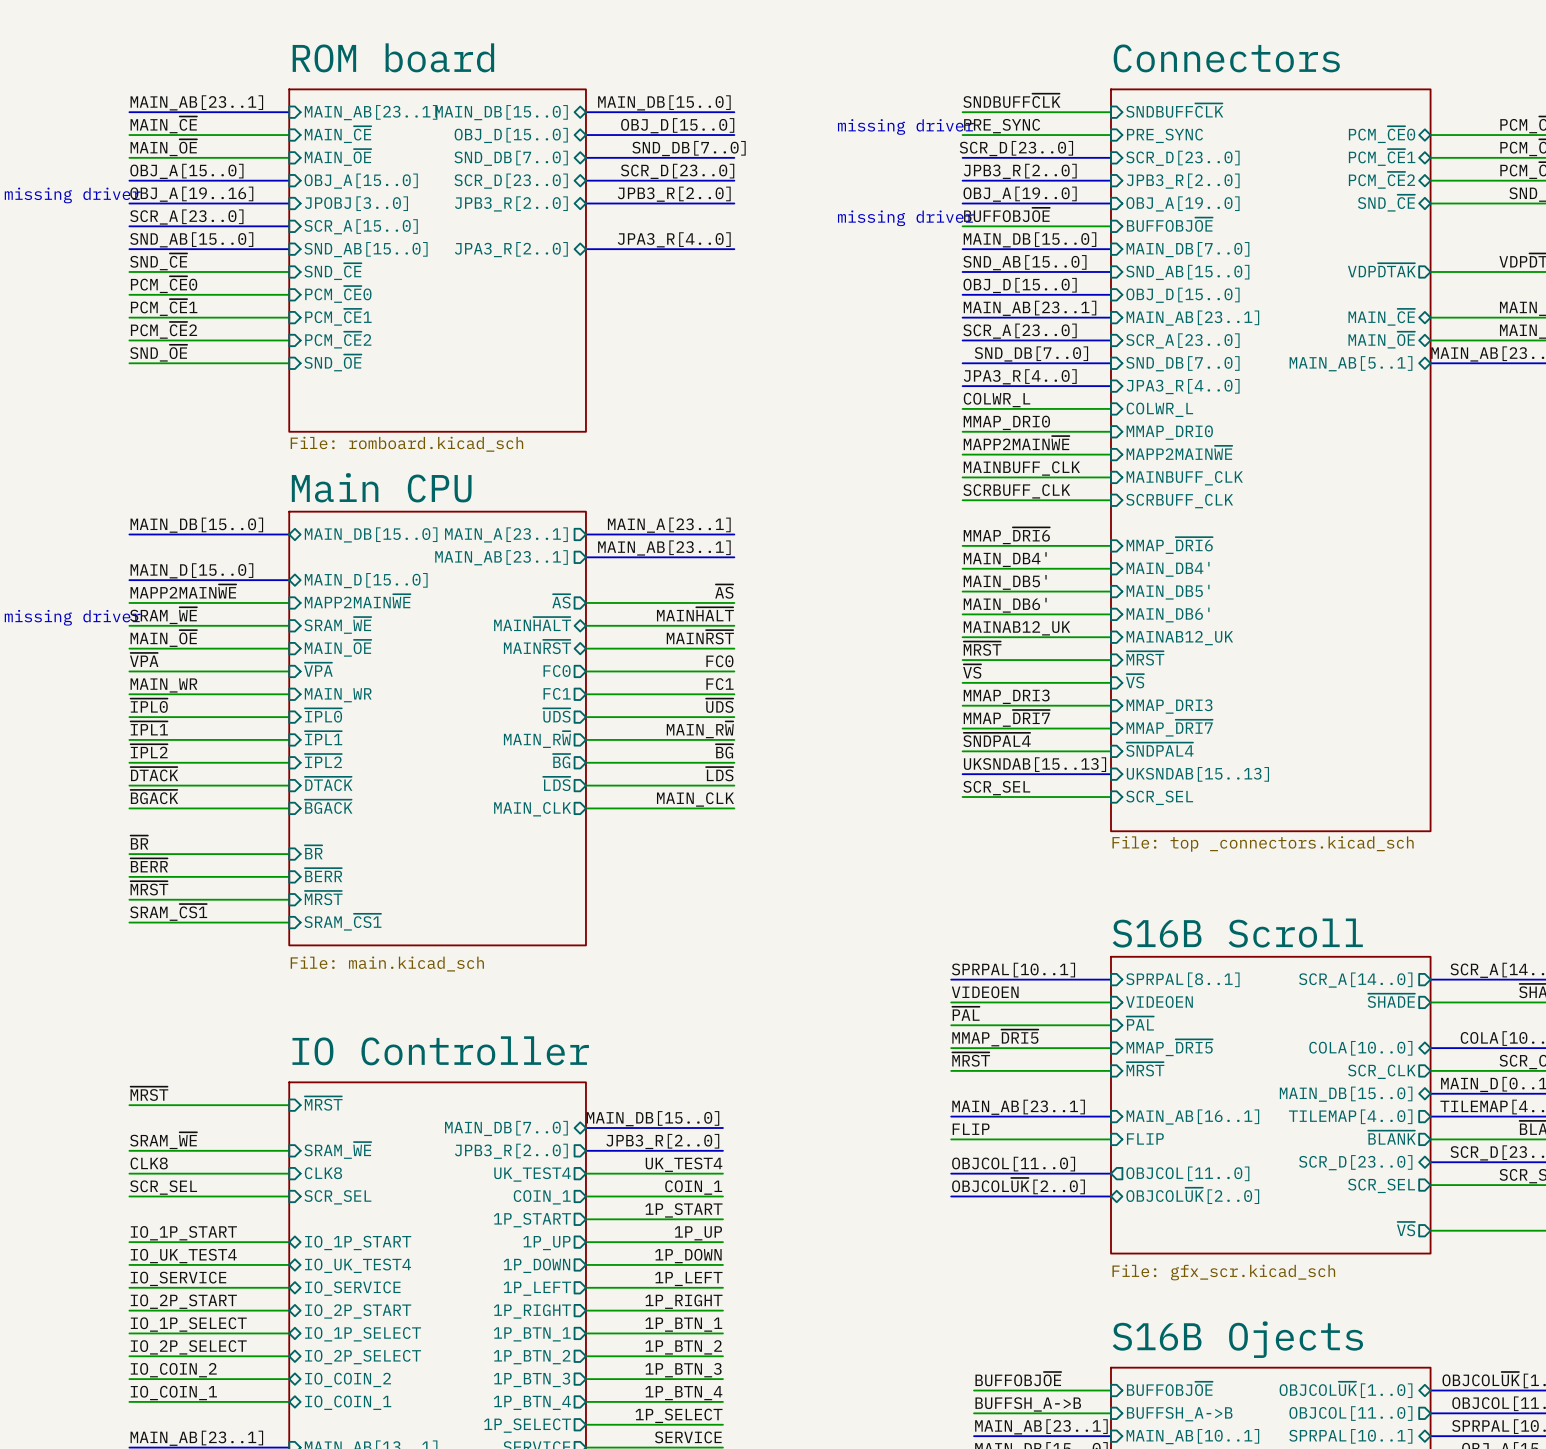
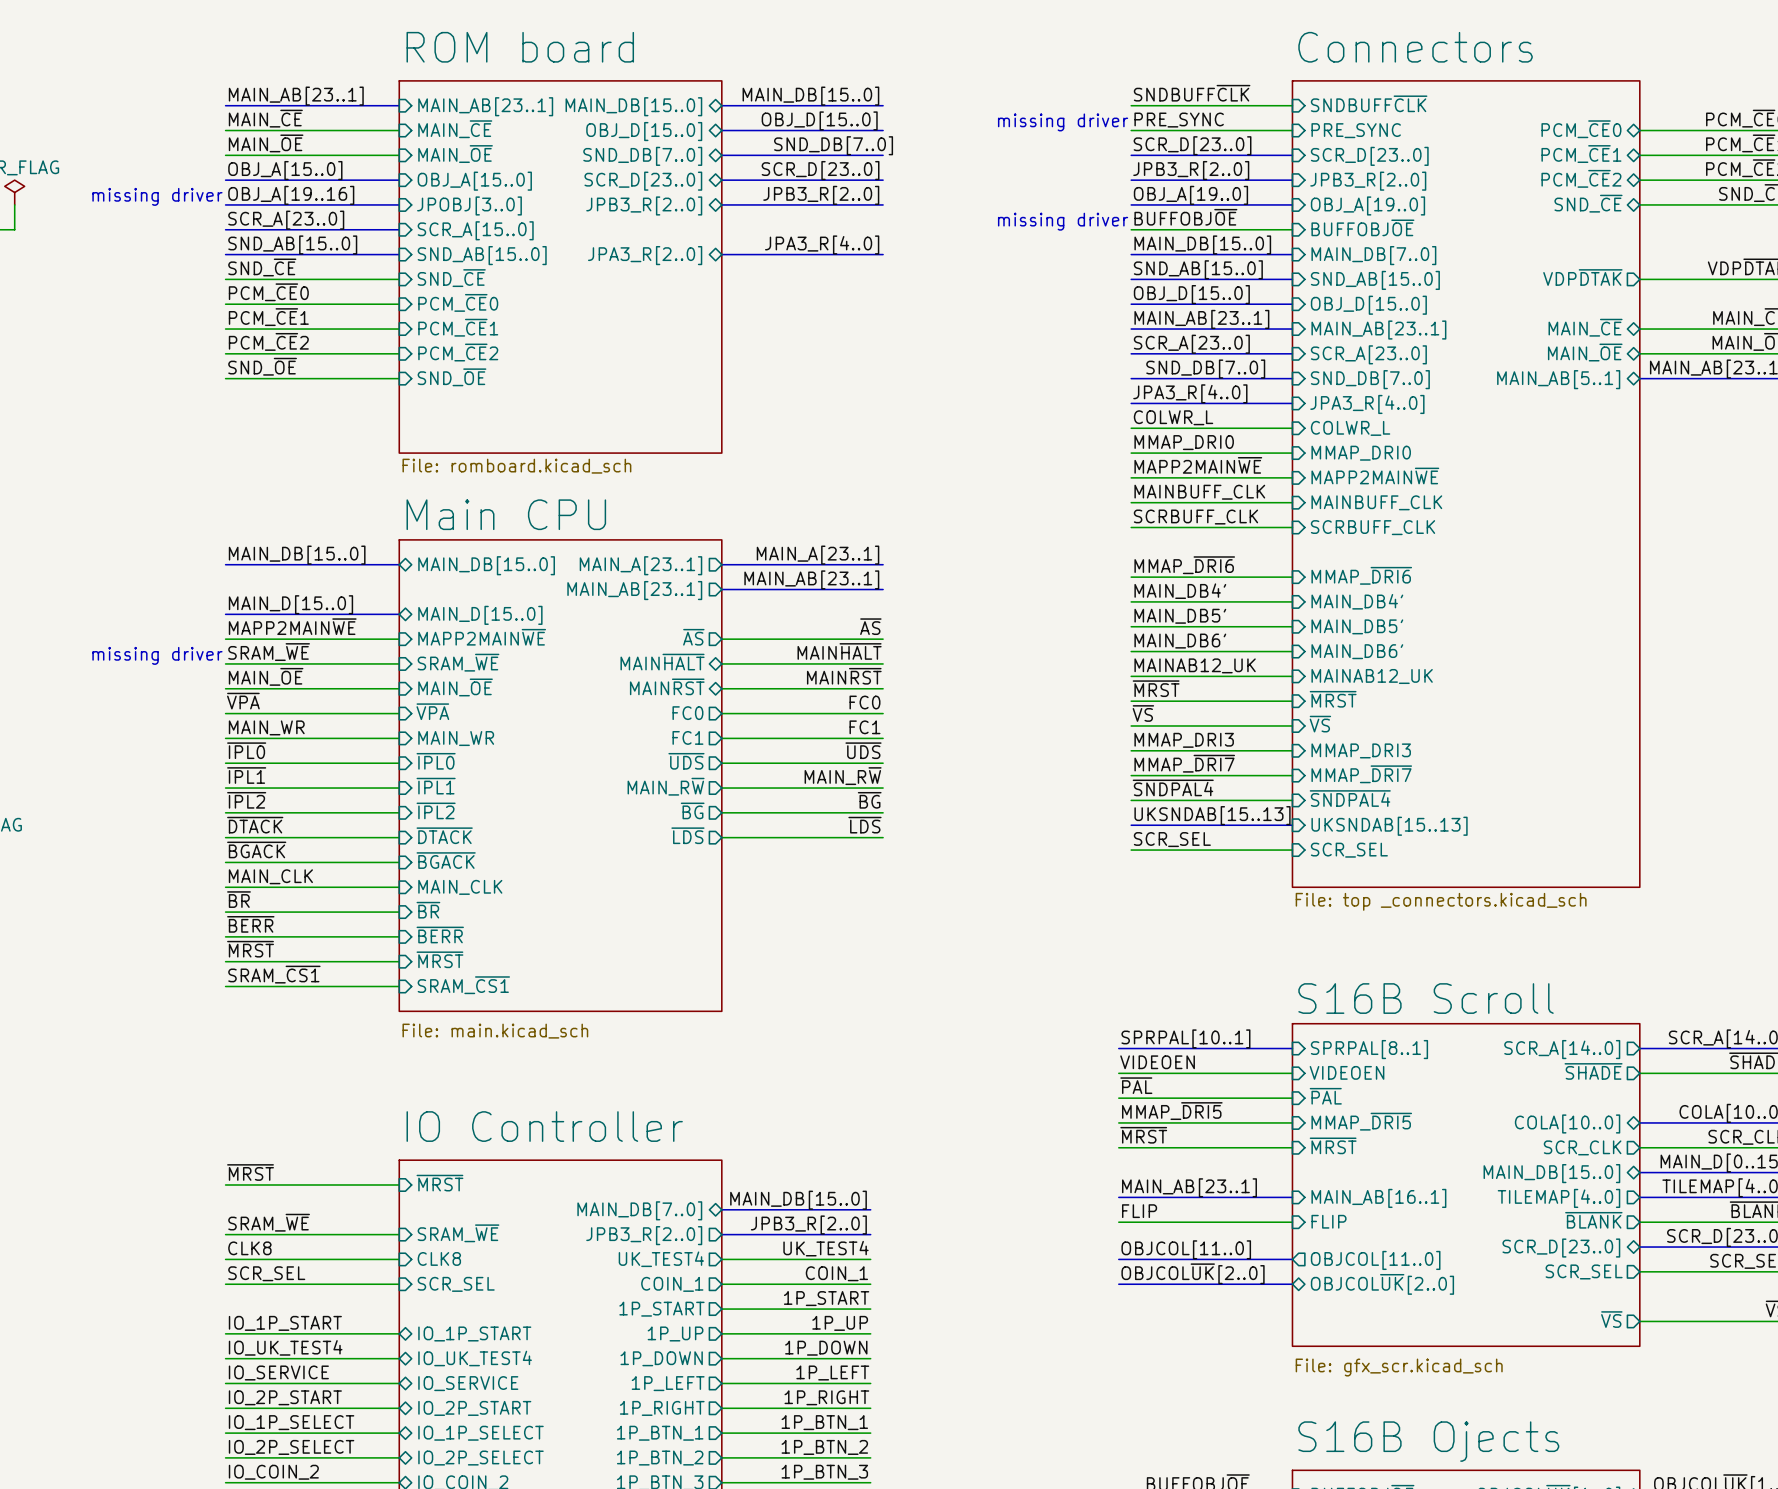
label: MAIN_CLK (695, 799) -> none
wire: (585, 808) (734, 808) -> none
sheet pin: MAIN_CLK (532, 809) -> none
label: none -> MAIN_CLK (270, 876)
wire: none -> (225, 887) (399, 887)
sheet pin: none -> MAIN_CLK (460, 887)

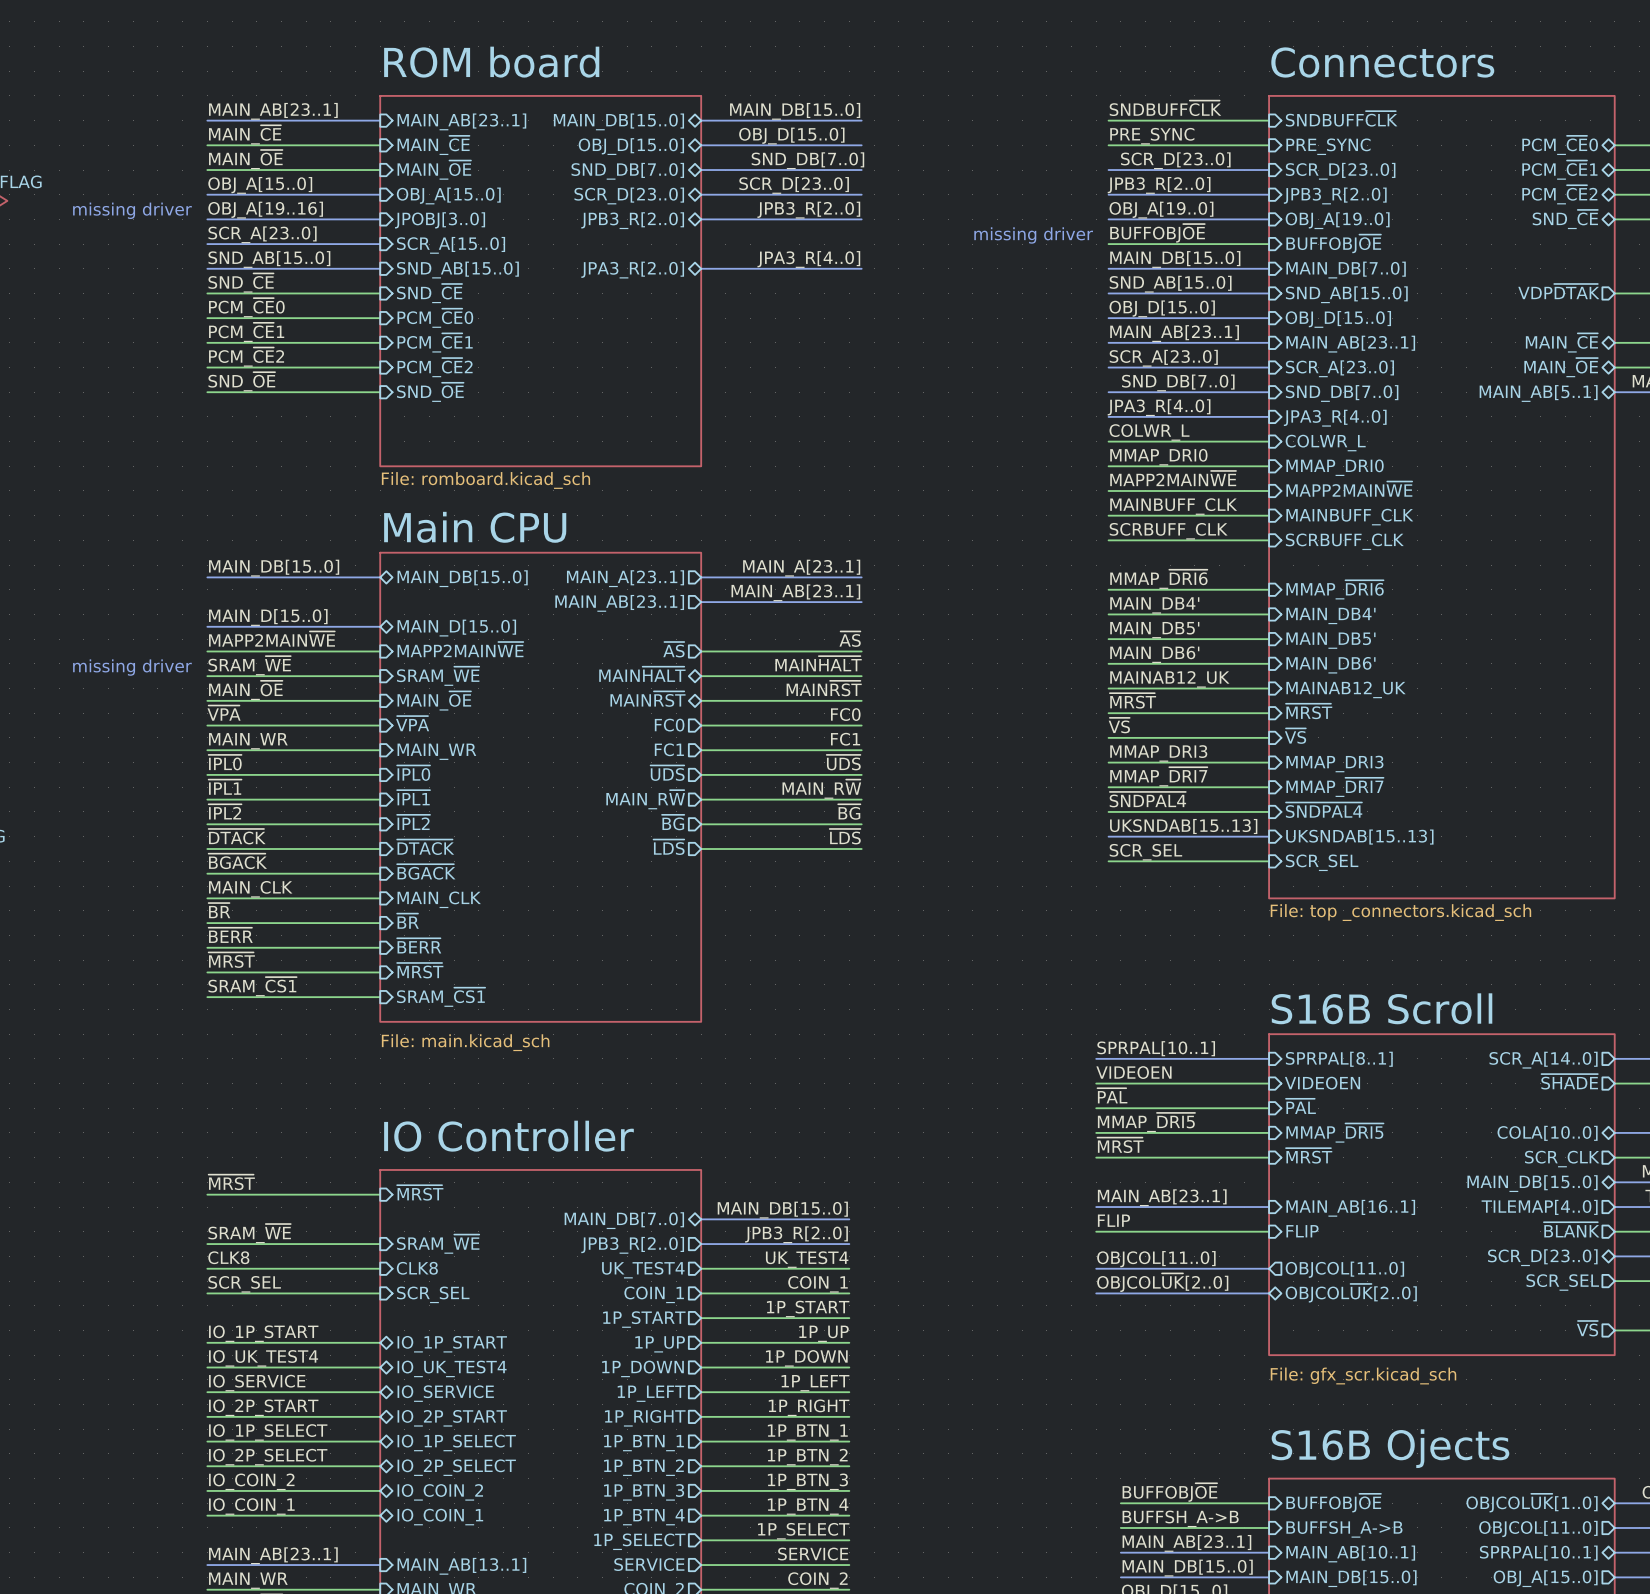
text: missing driver (1063, 122) -> none

